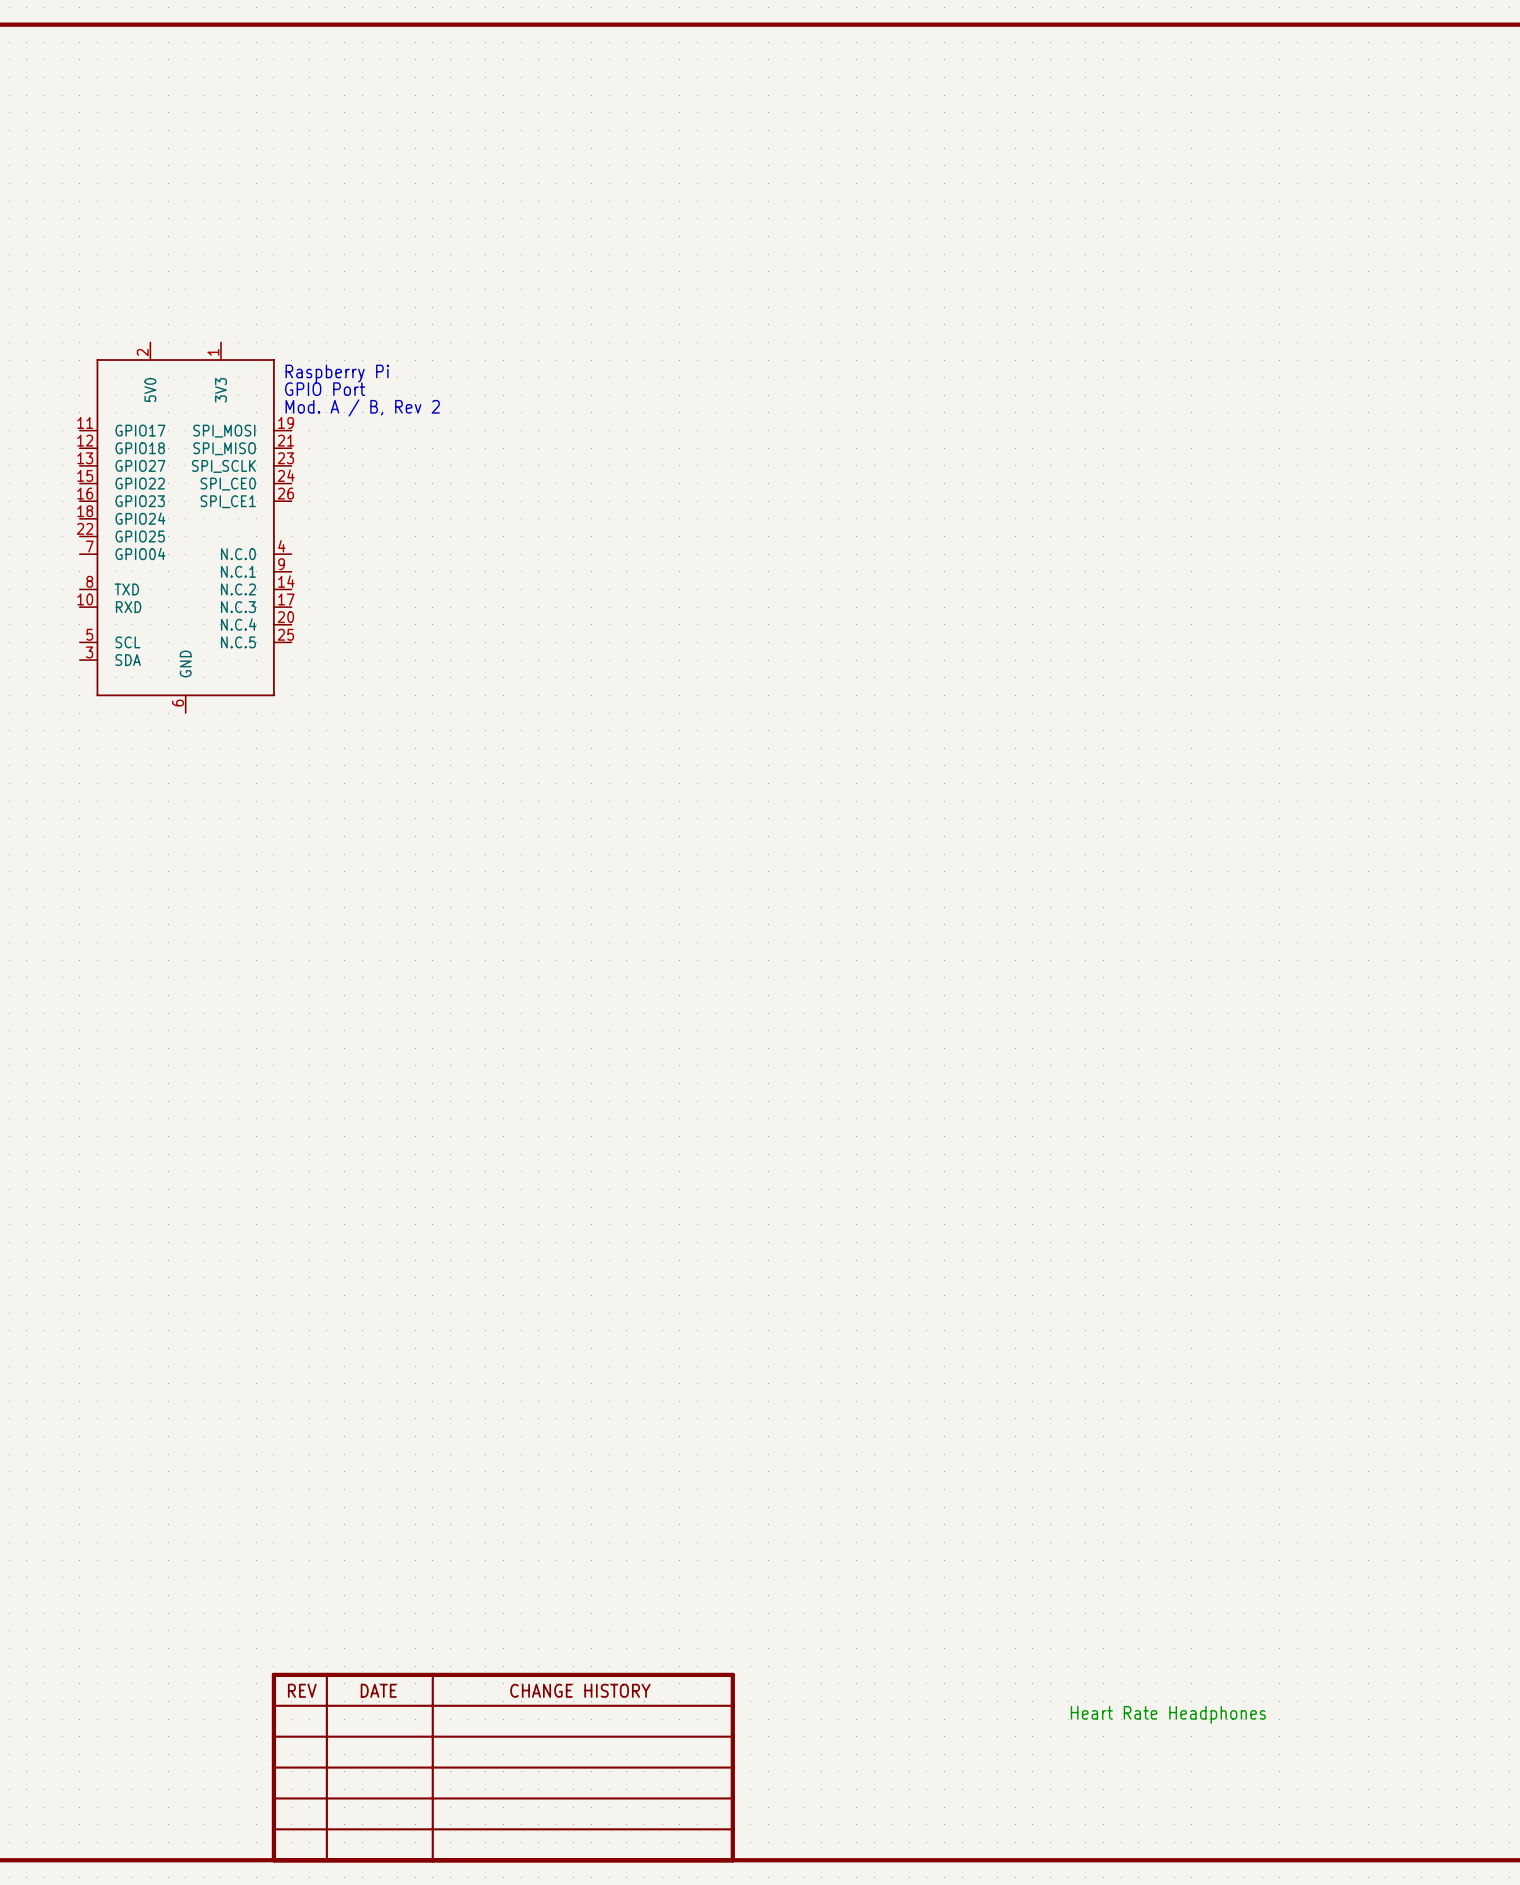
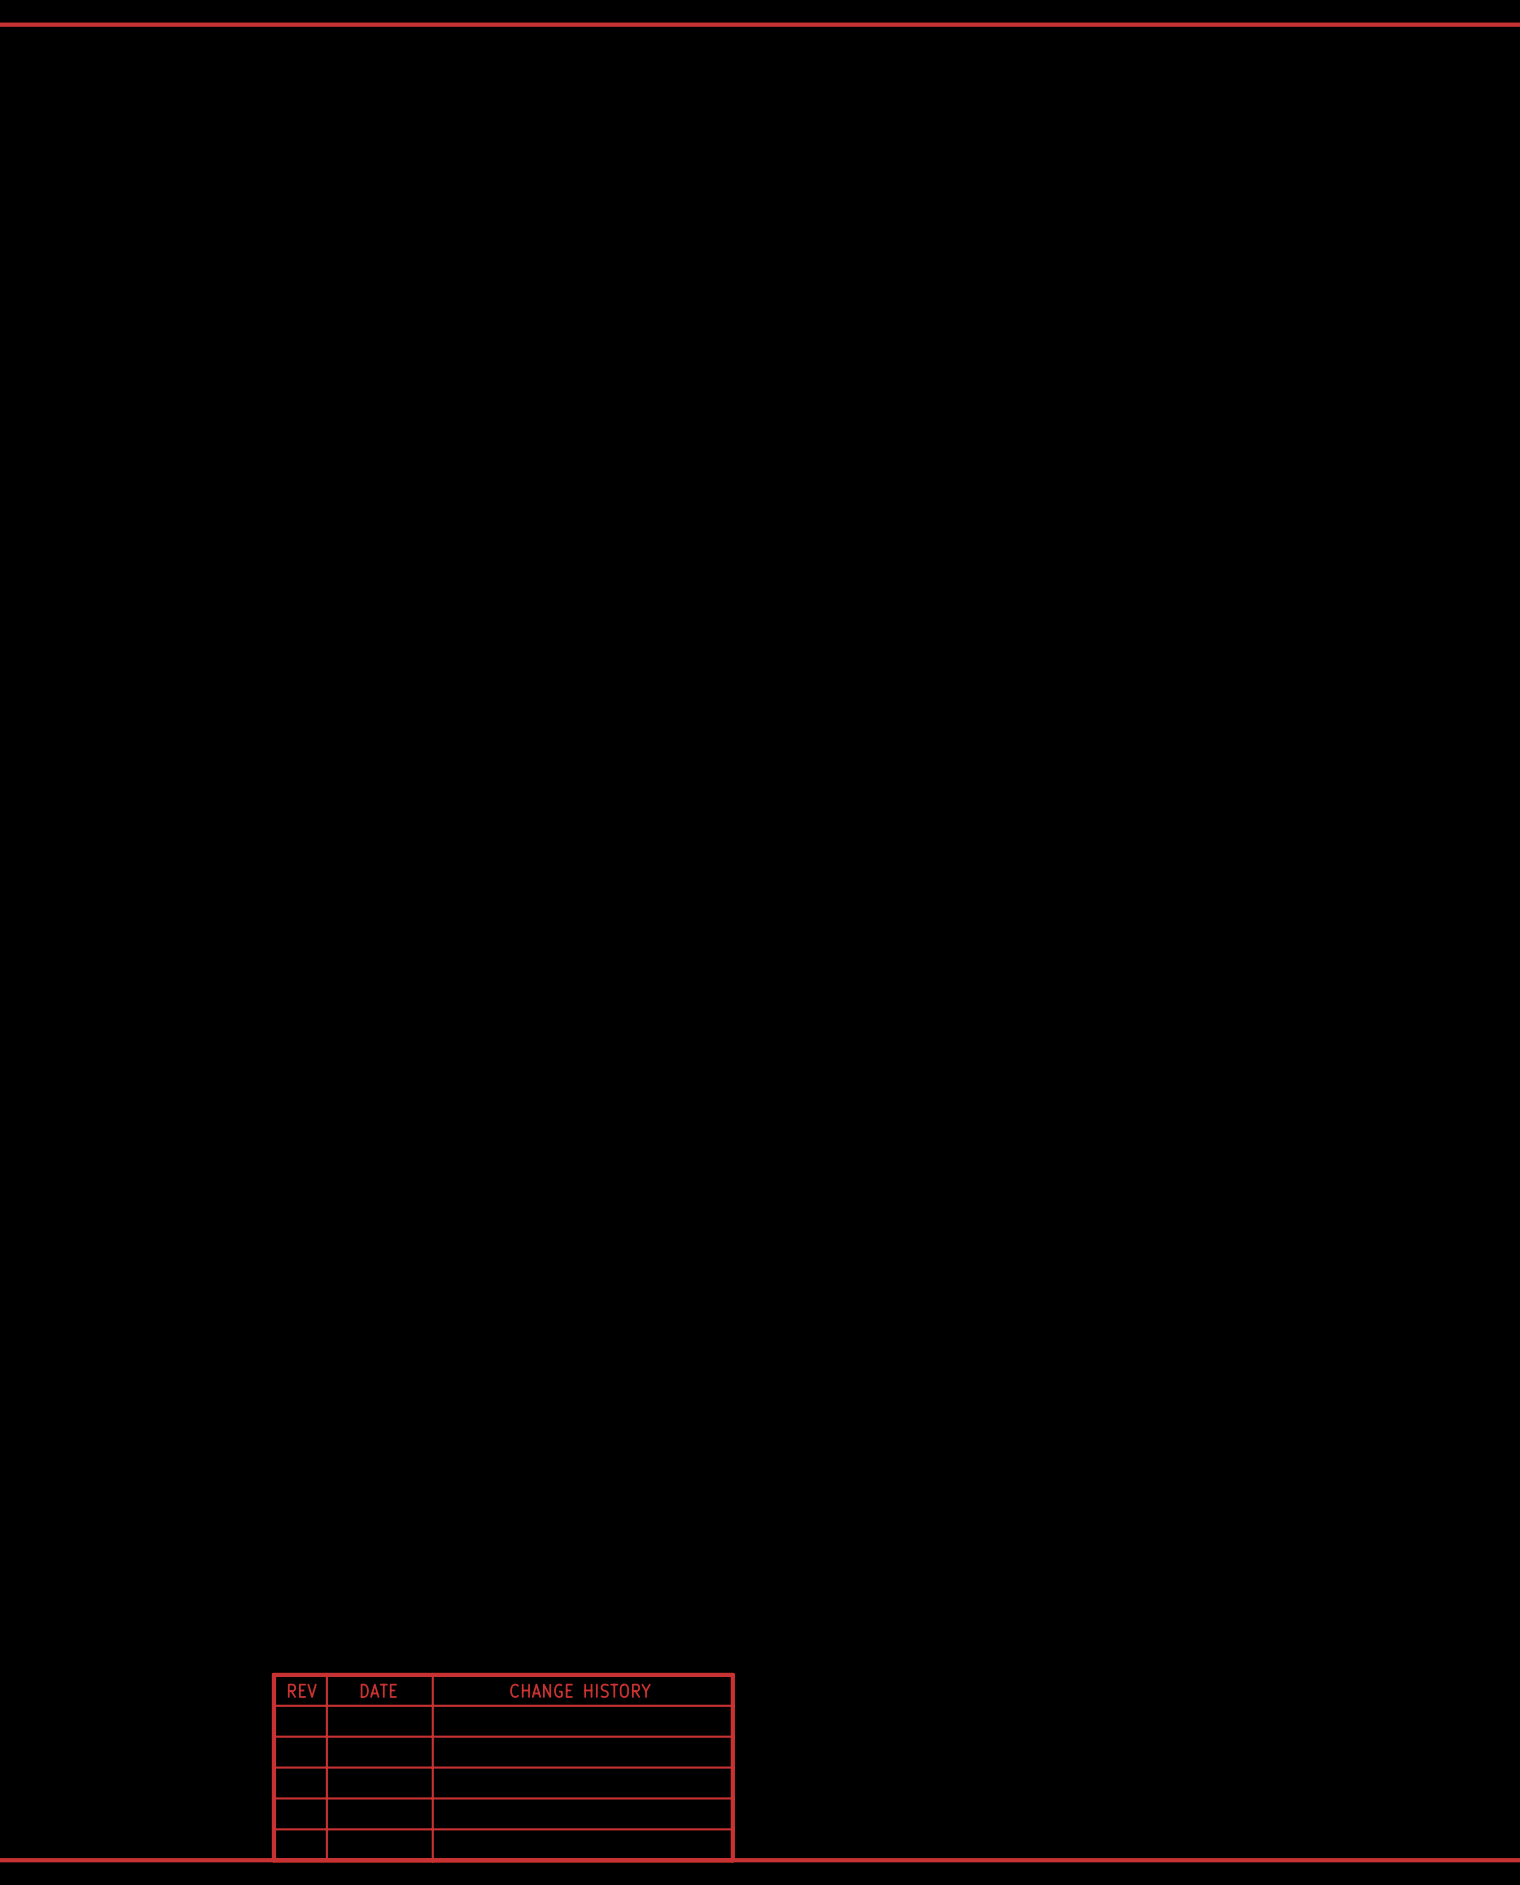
part: (185, 527) -> none
text: Heart Rate Headphones (1168, 1714) -> none

